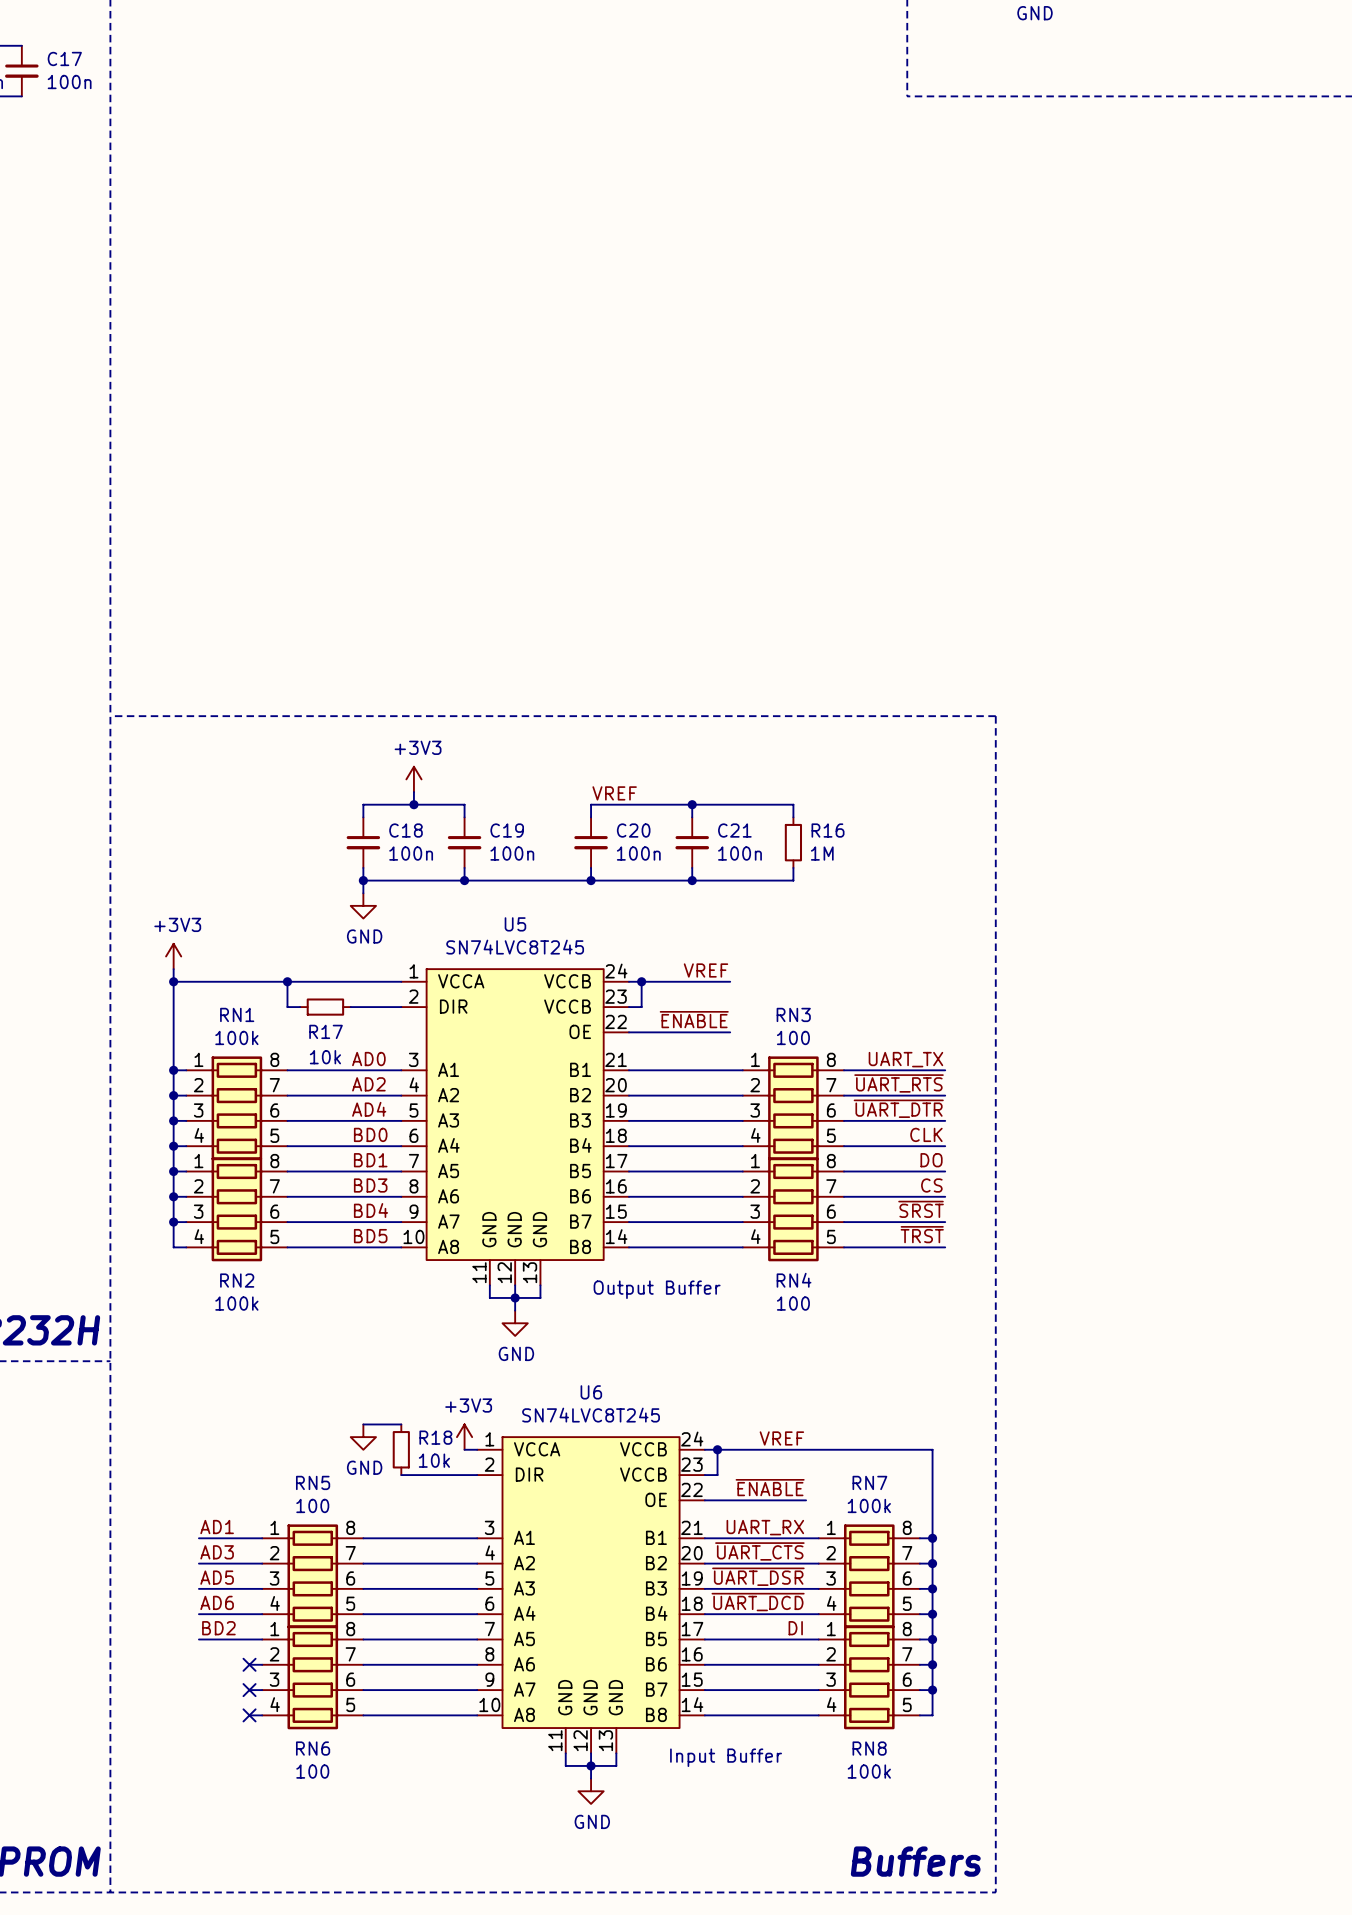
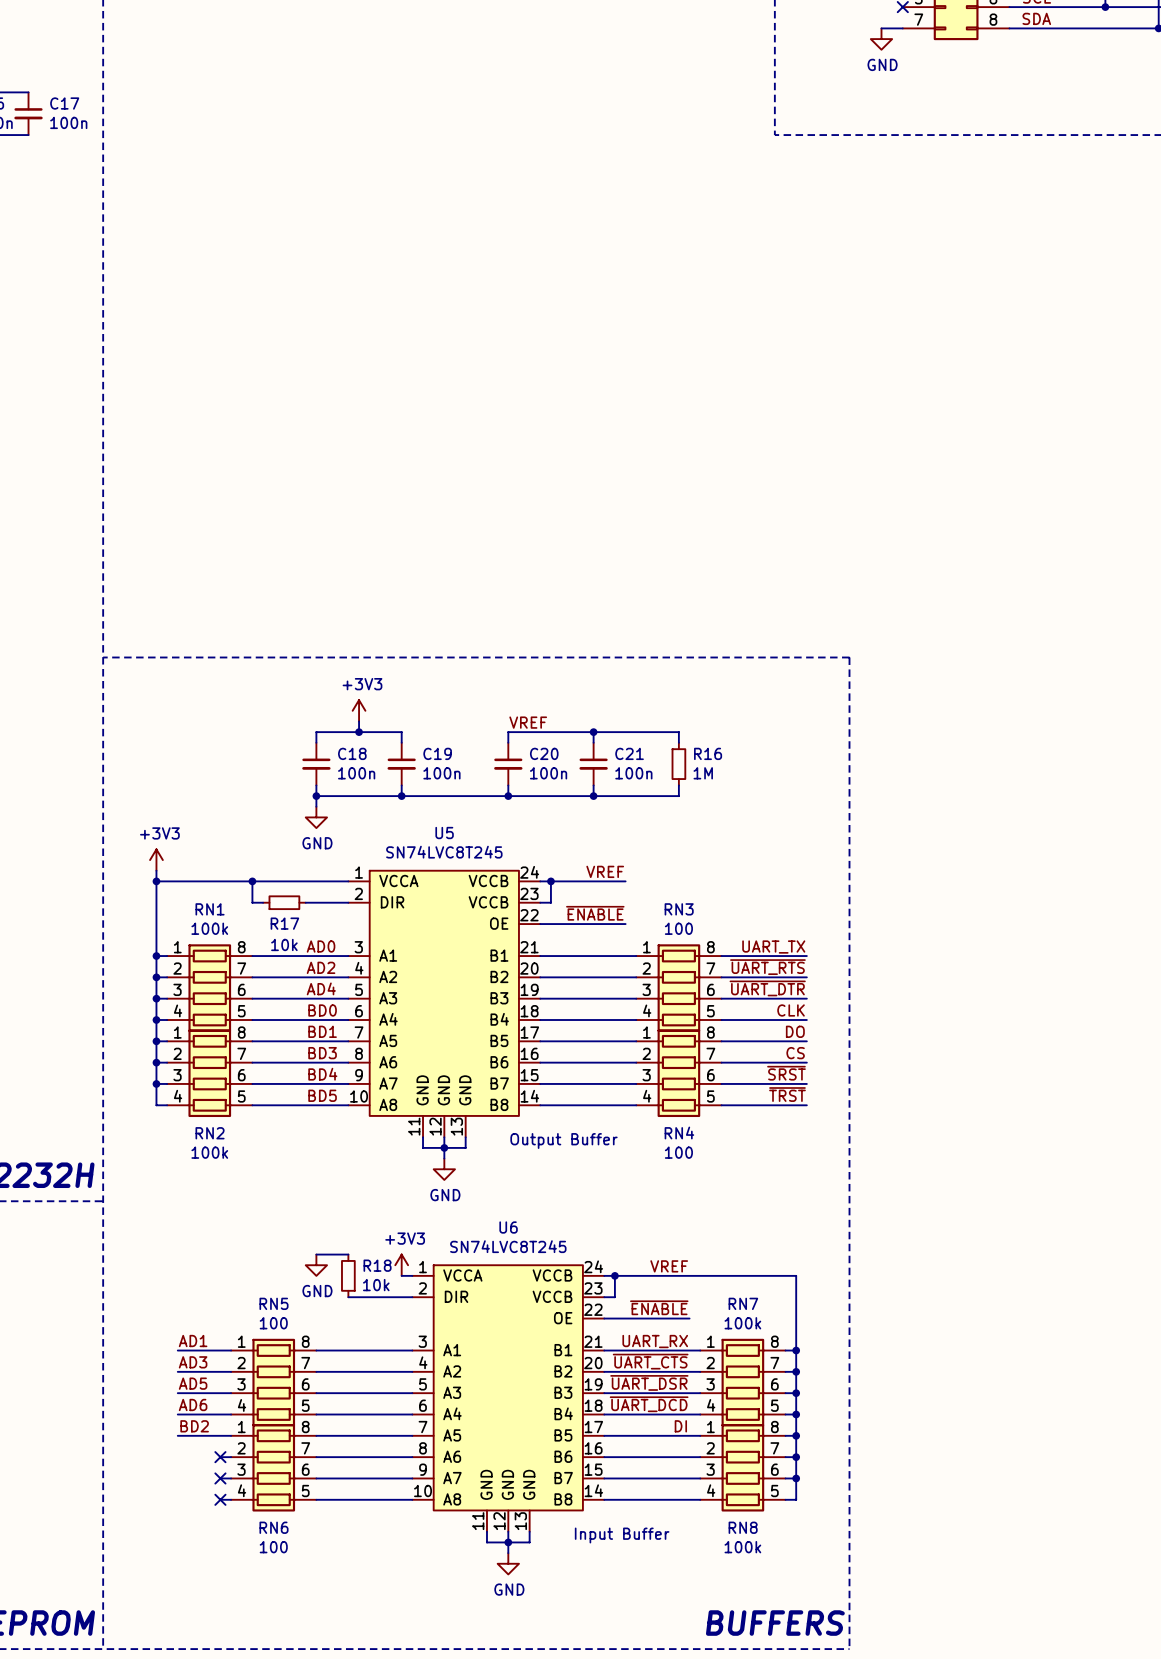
text: none -> BUFFERS (775, 1623)
text: Buffers (915, 1861) -> none

